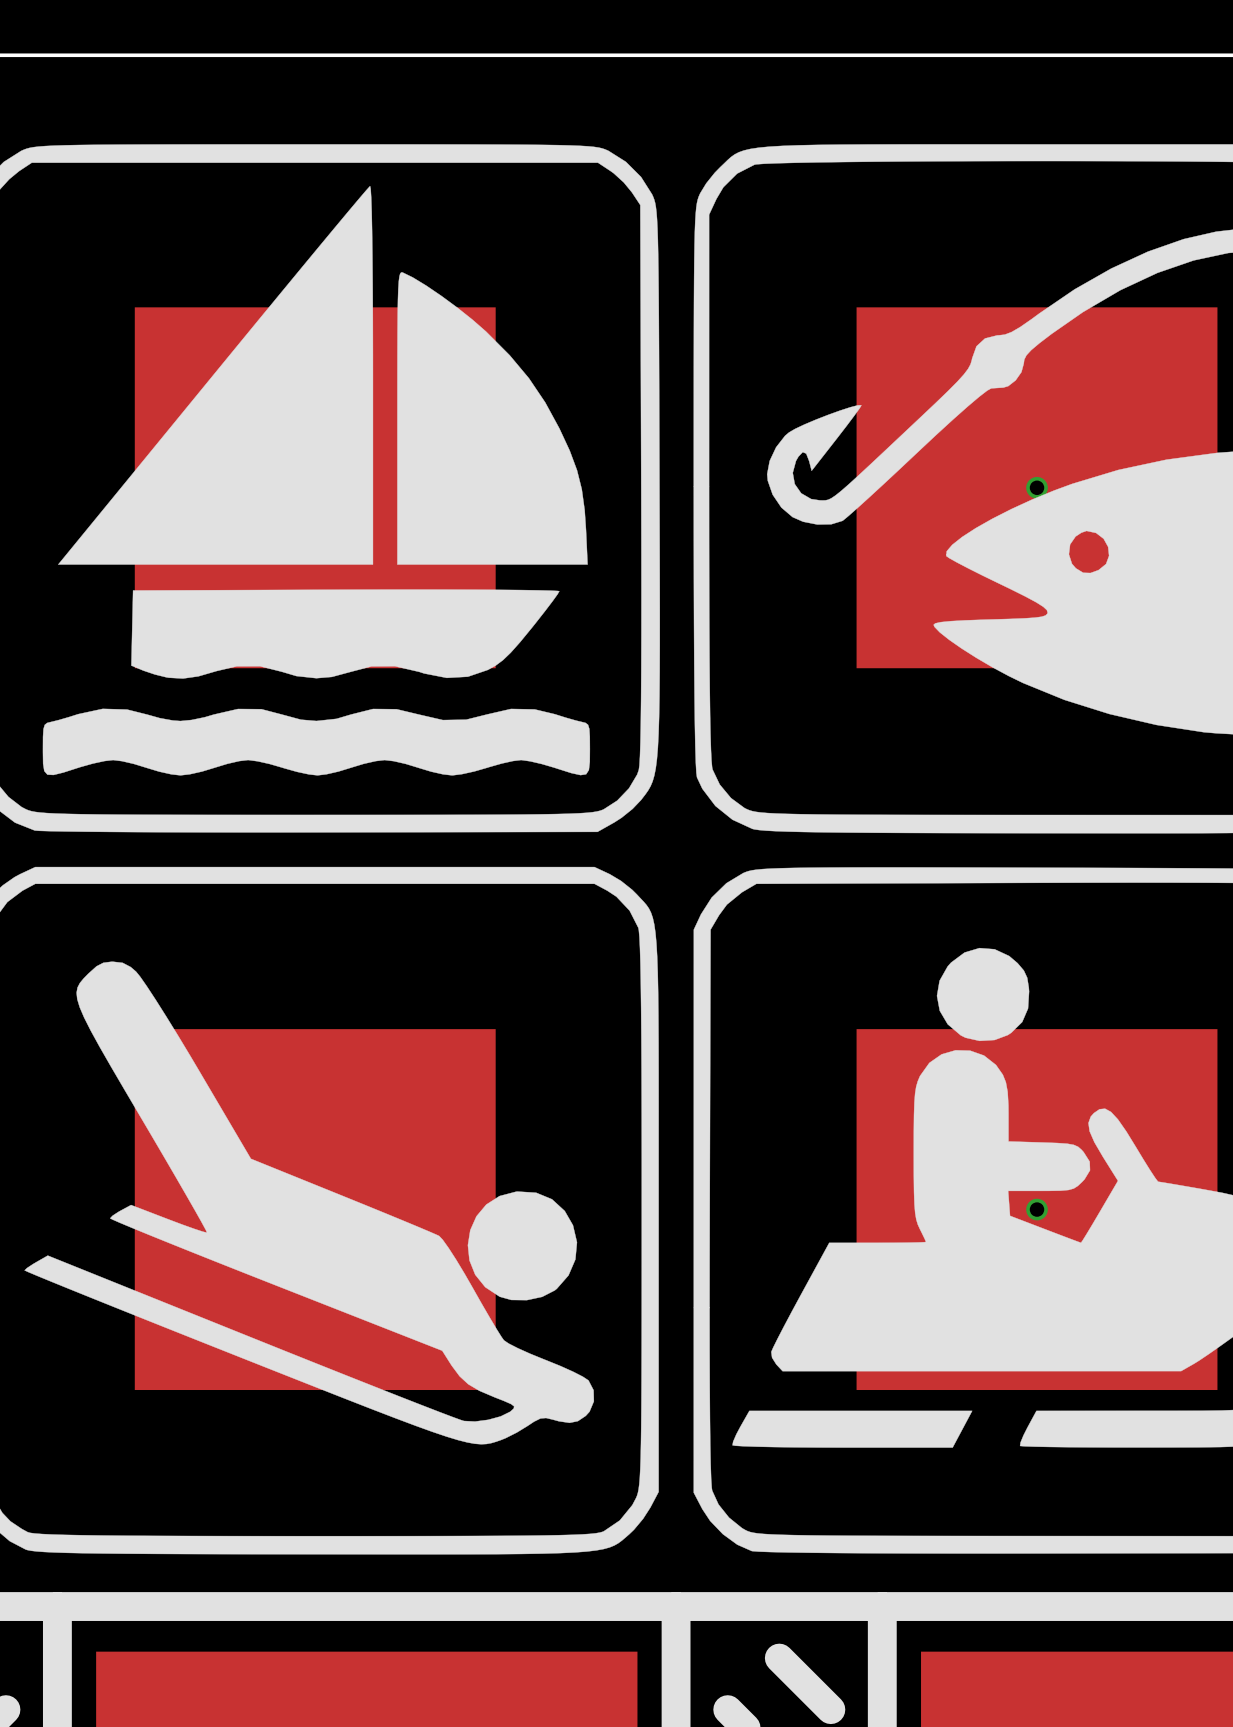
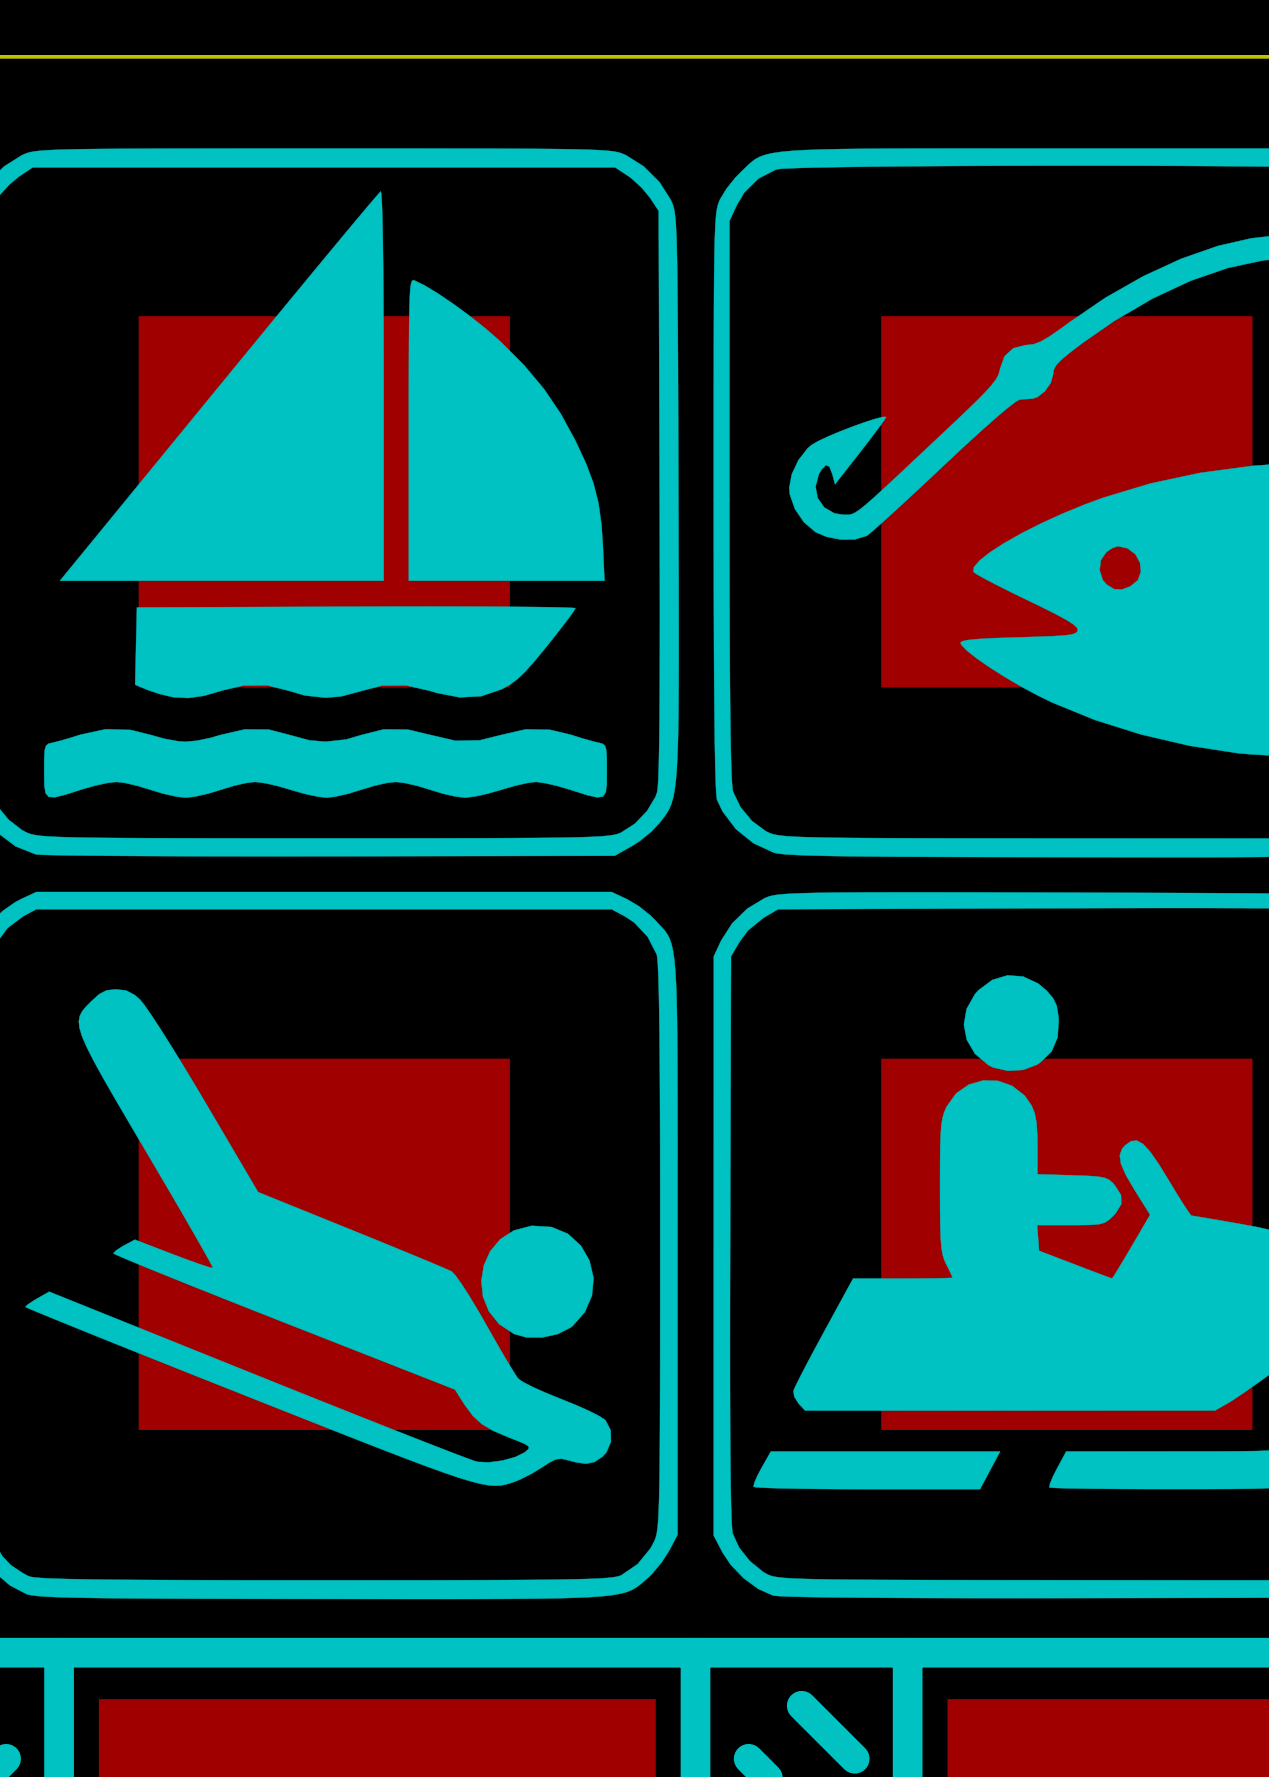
via: (1037, 487) -> none
via: (1037, 1209) -> none

